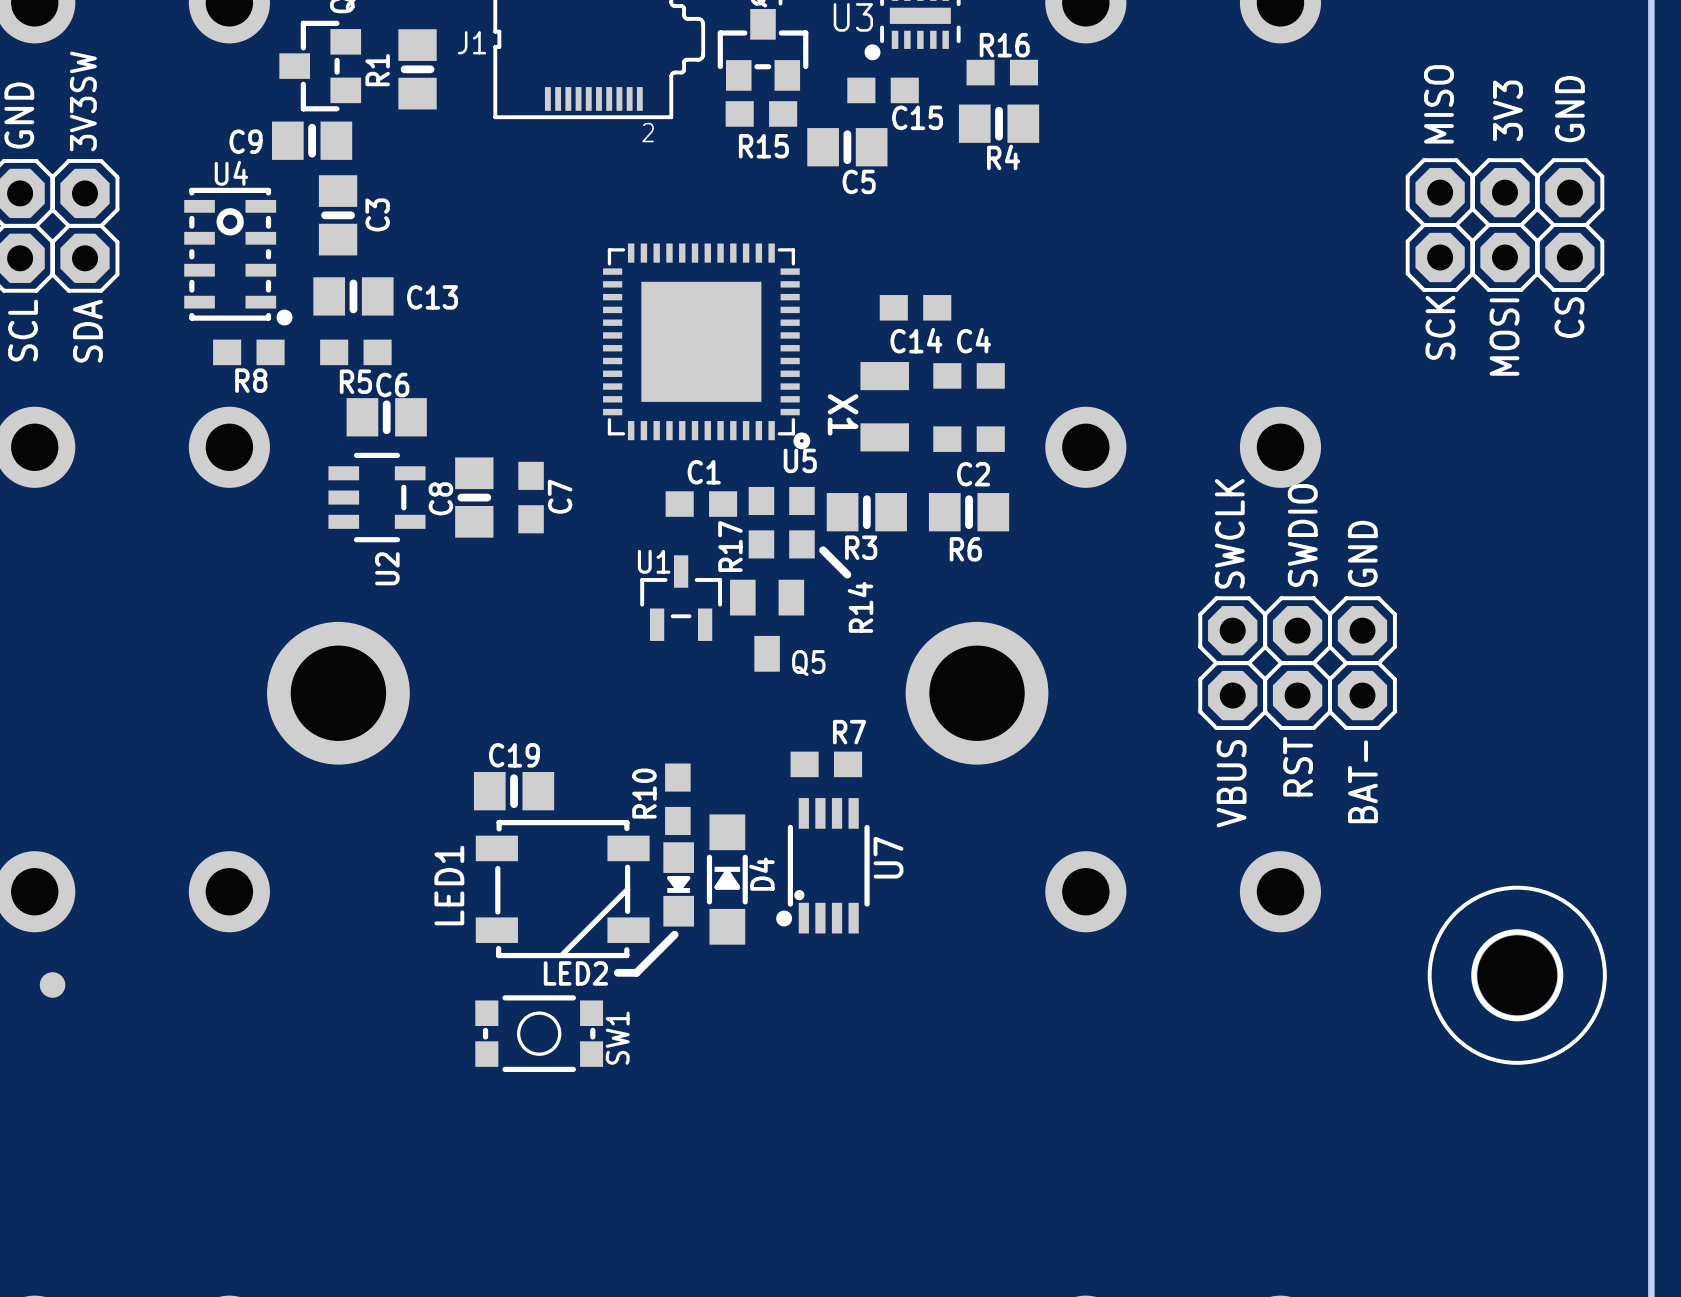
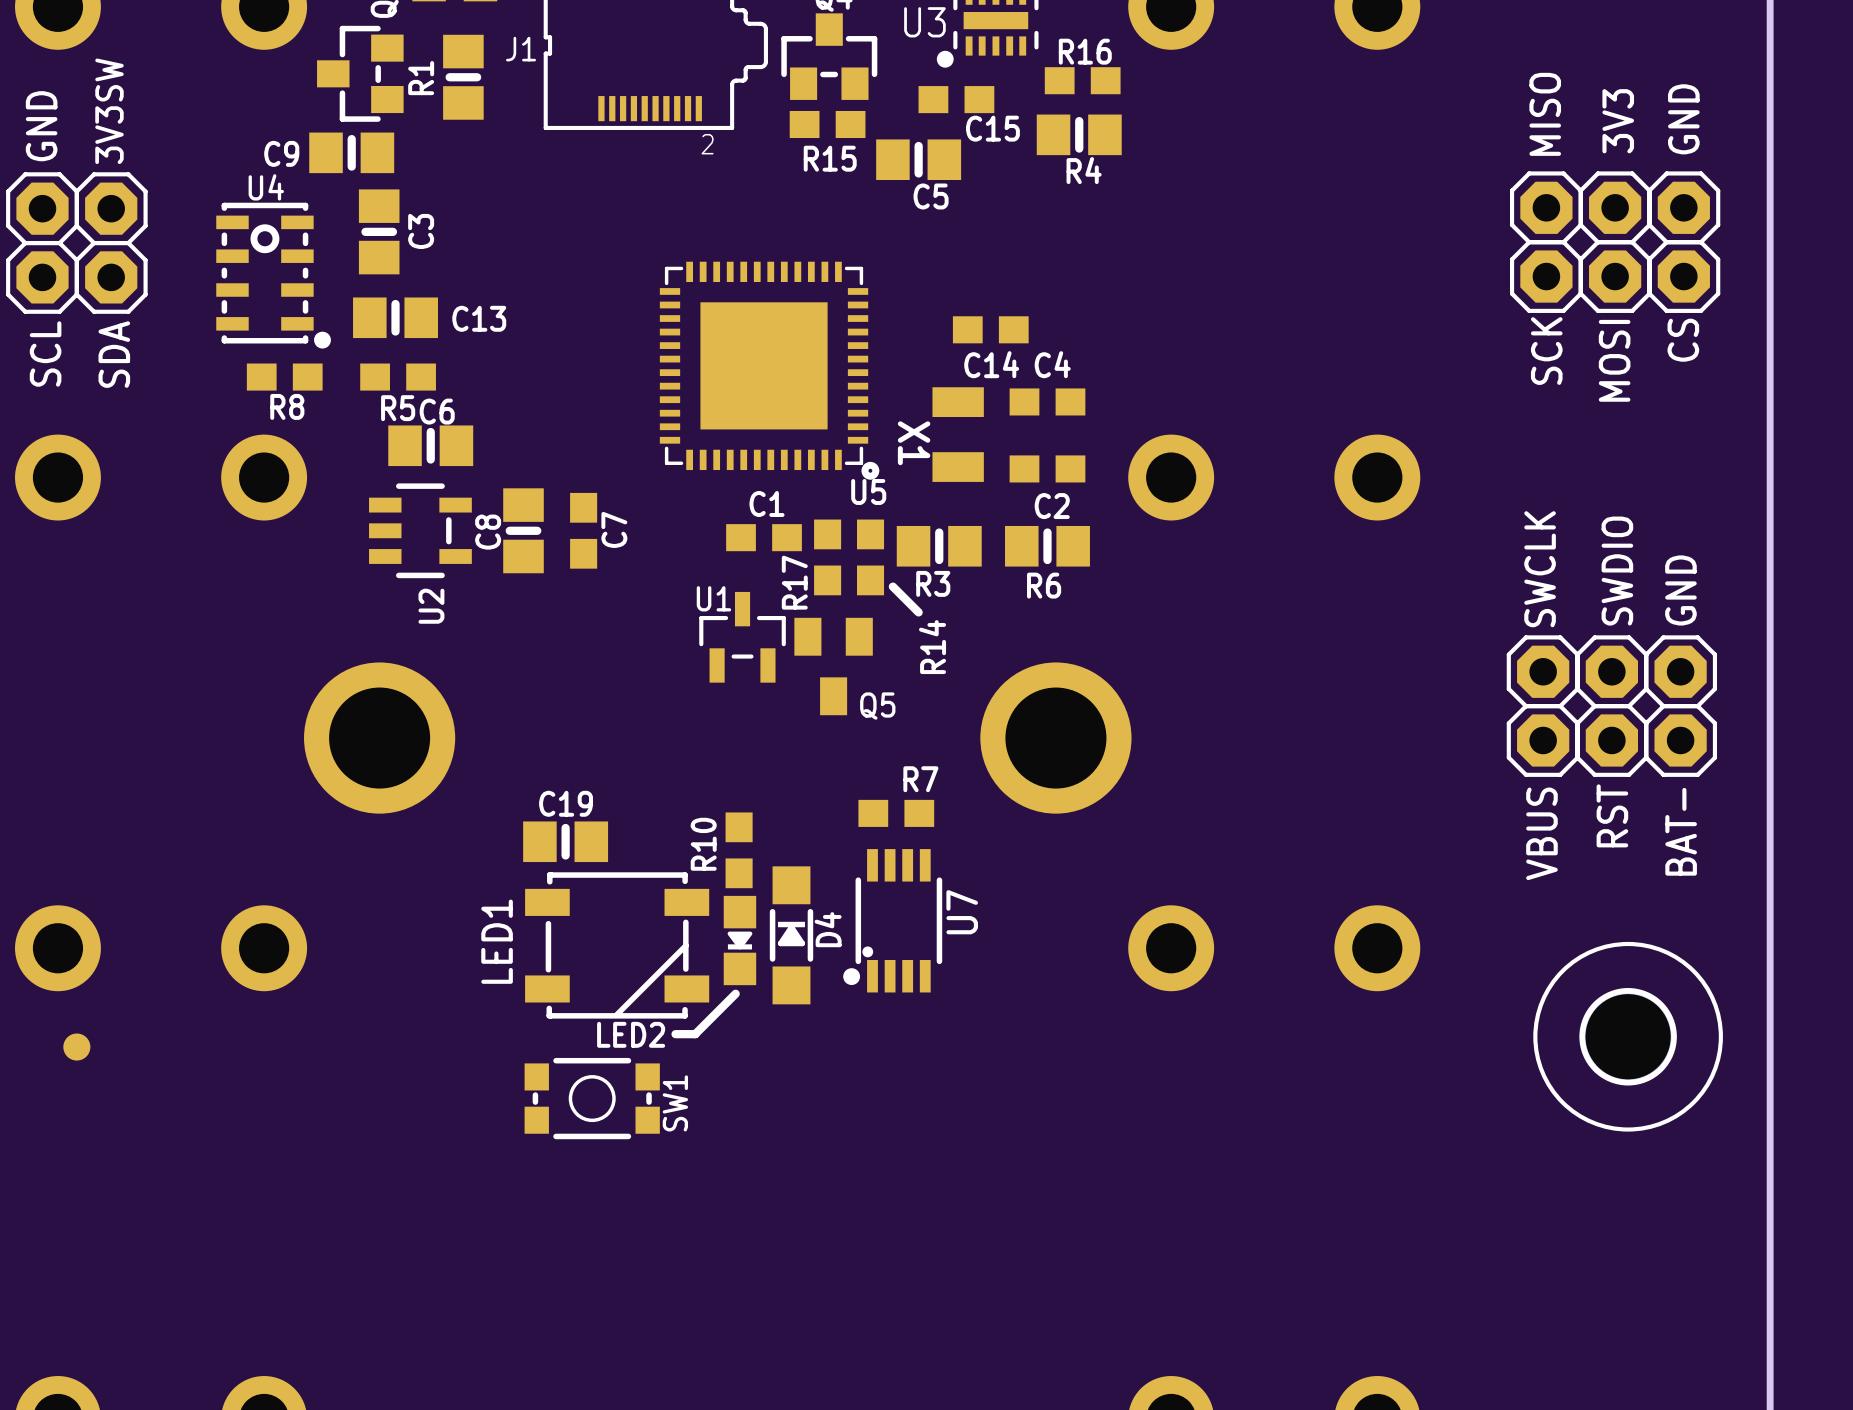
SWCLK position: (1232, 630) -> (1543, 671)
SWDIO position: (1297, 630) -> (1611, 671)
GND position: (1362, 630) -> (1680, 671)
VBUS position: (1232, 695) -> (1543, 740)
RST position: (1297, 695) -> (1611, 740)
BAT- position: (1362, 695) -> (1680, 740)

